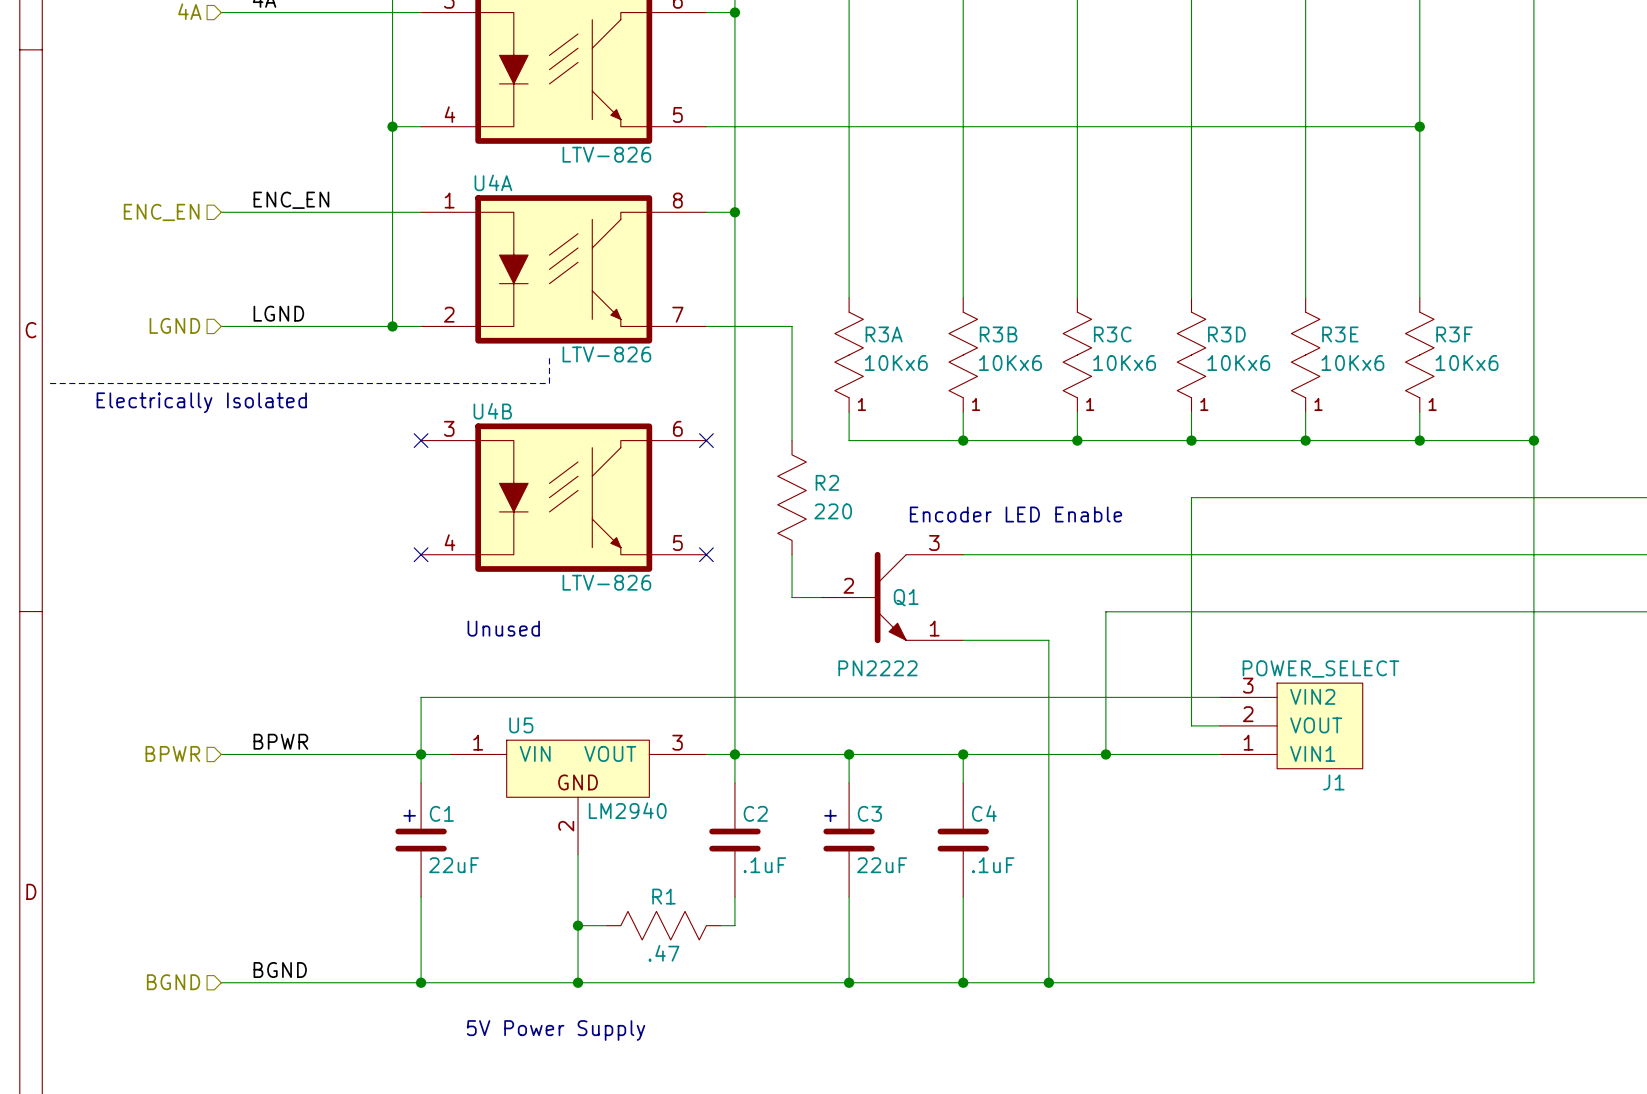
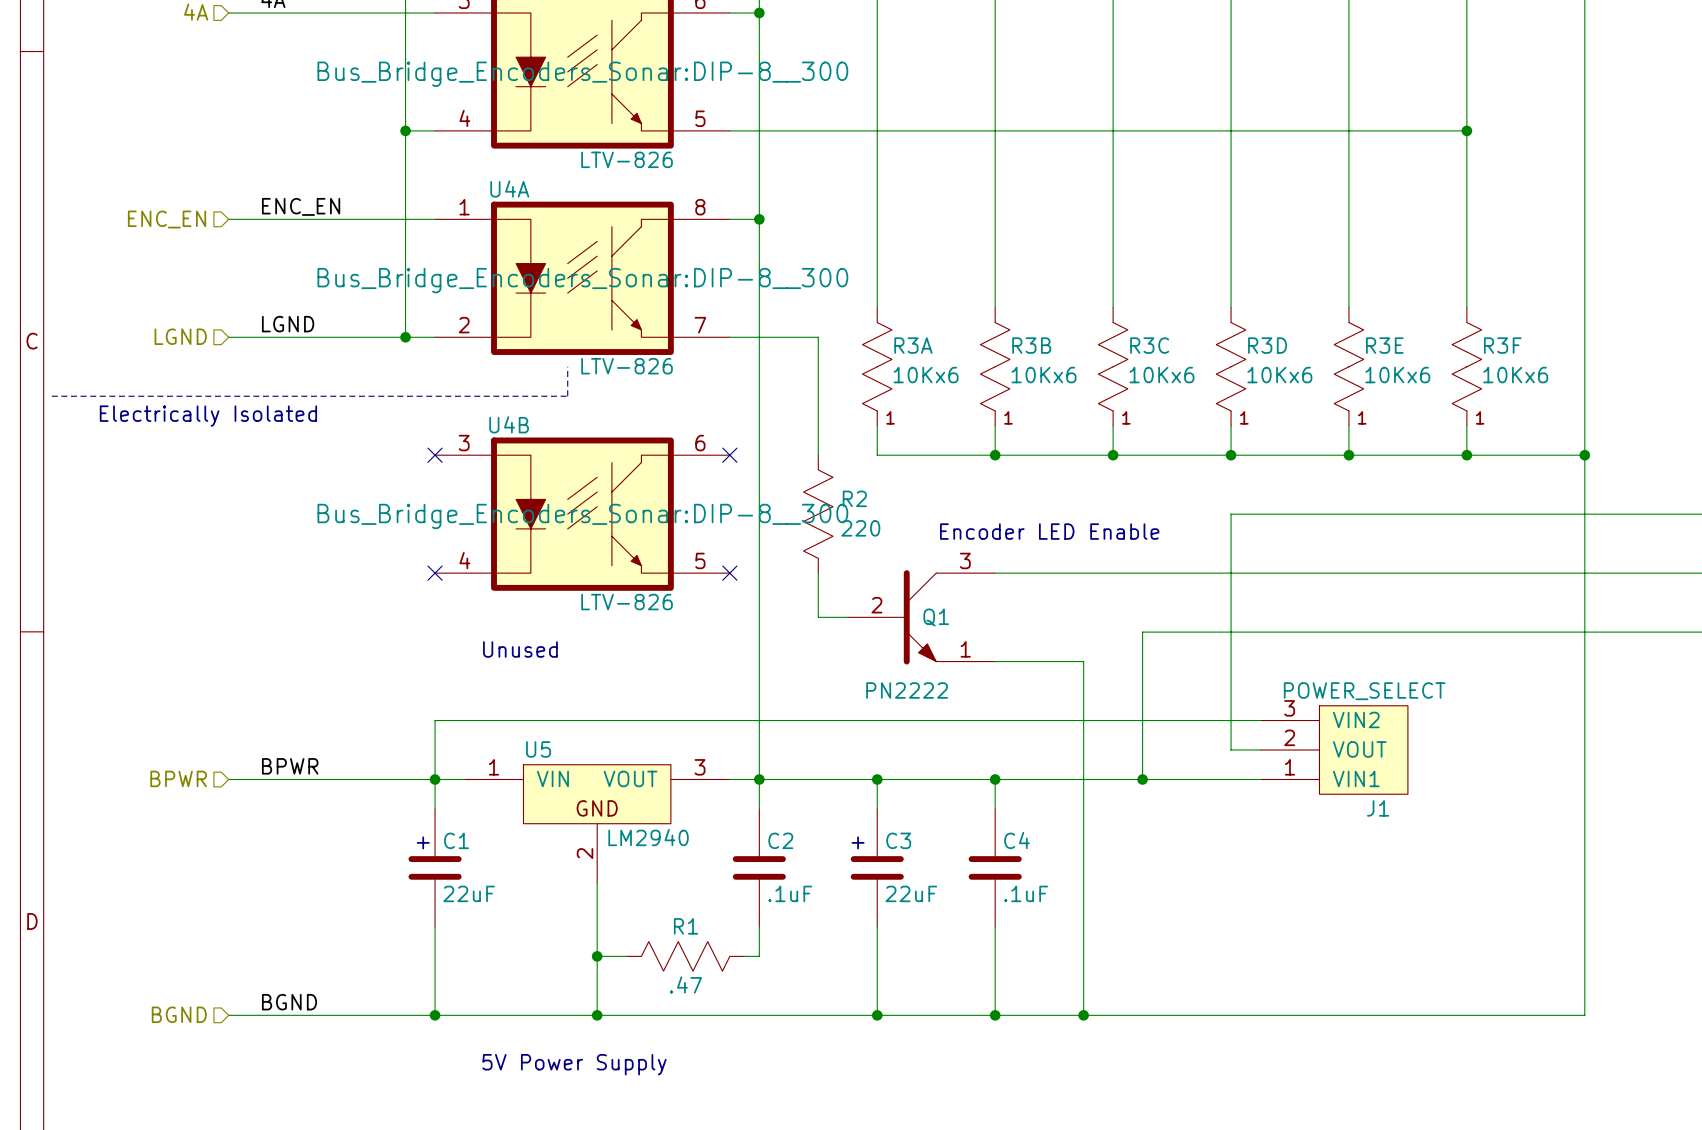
part text: none -> Bus_Bridge_Encoders_Sonar:DIP-8__300 (582, 74)
U4A text: none -> Bus_Bridge_Encoders_Sonar:DIP-8__300 (582, 280)
U4B text: none -> Bus_Bridge_Encoders_Sonar:DIP-8__300 (582, 516)

